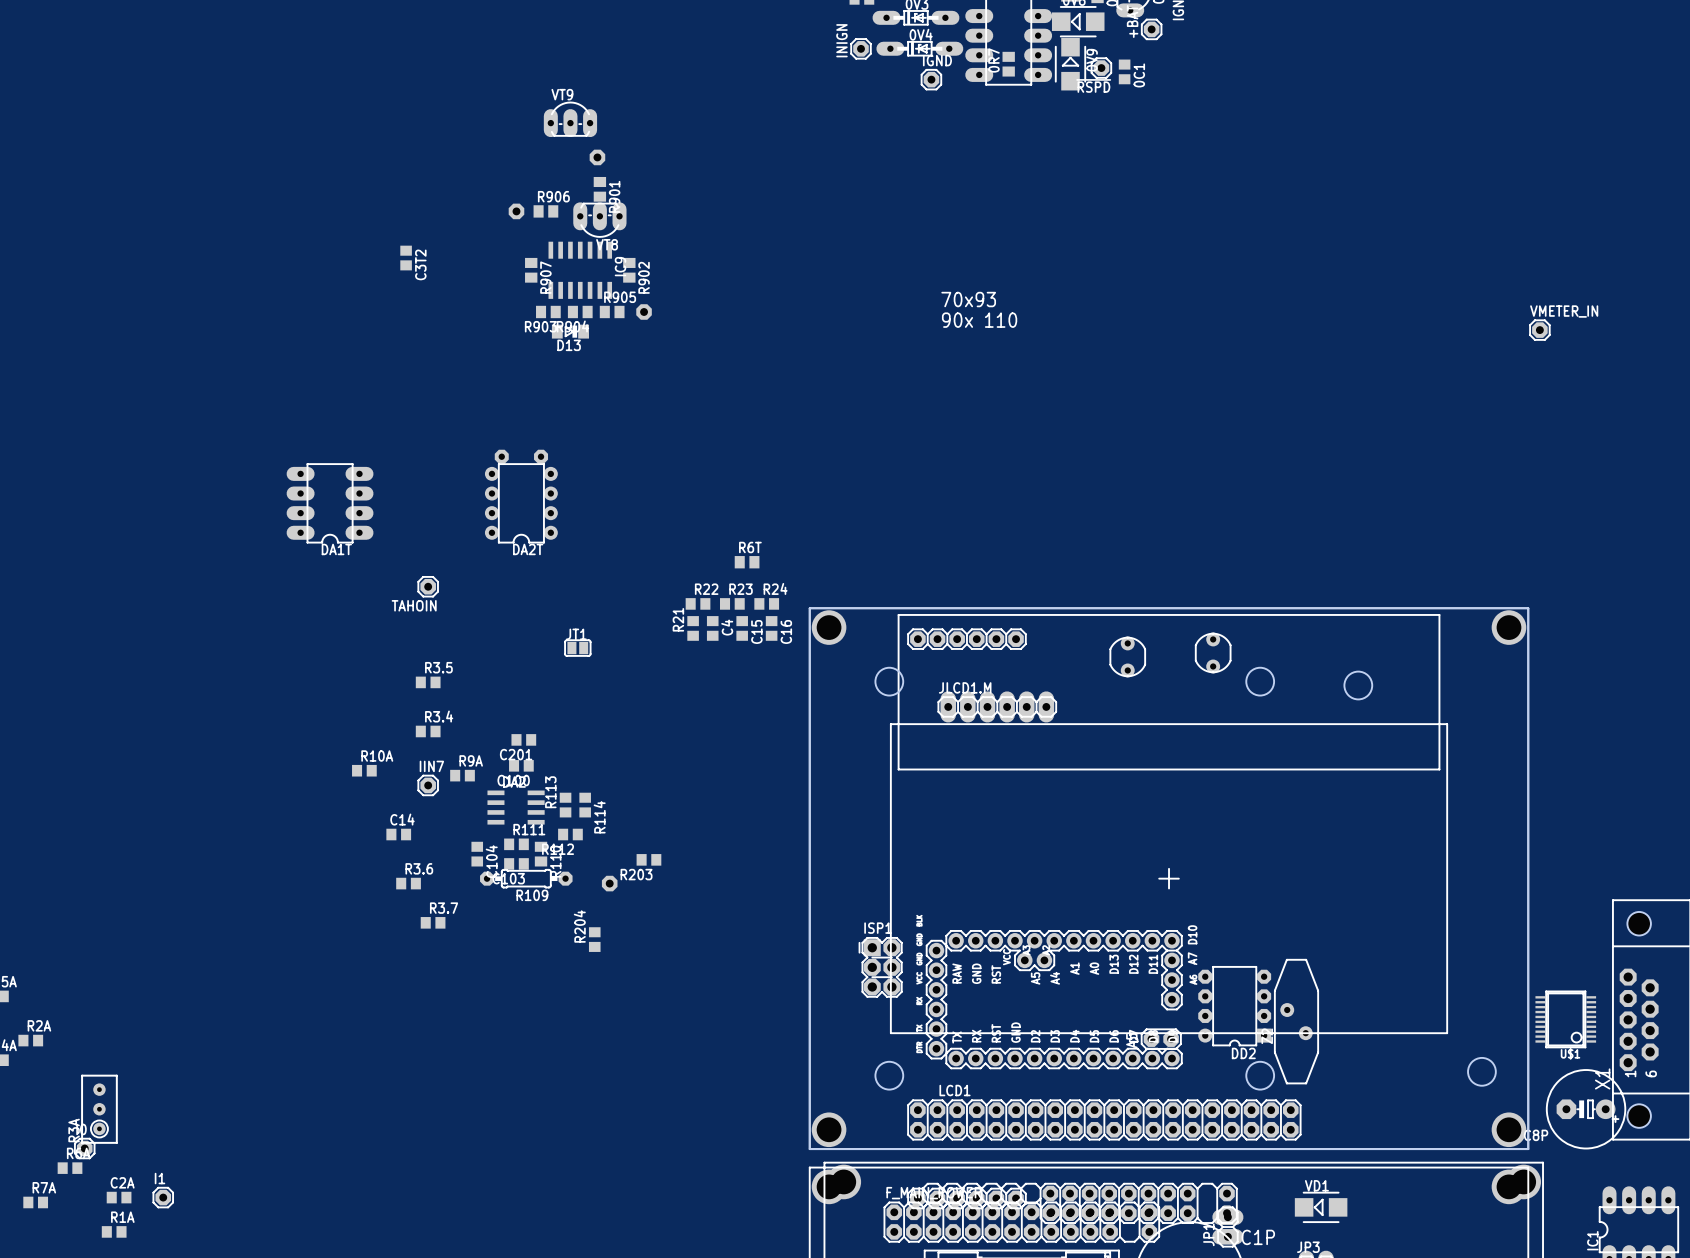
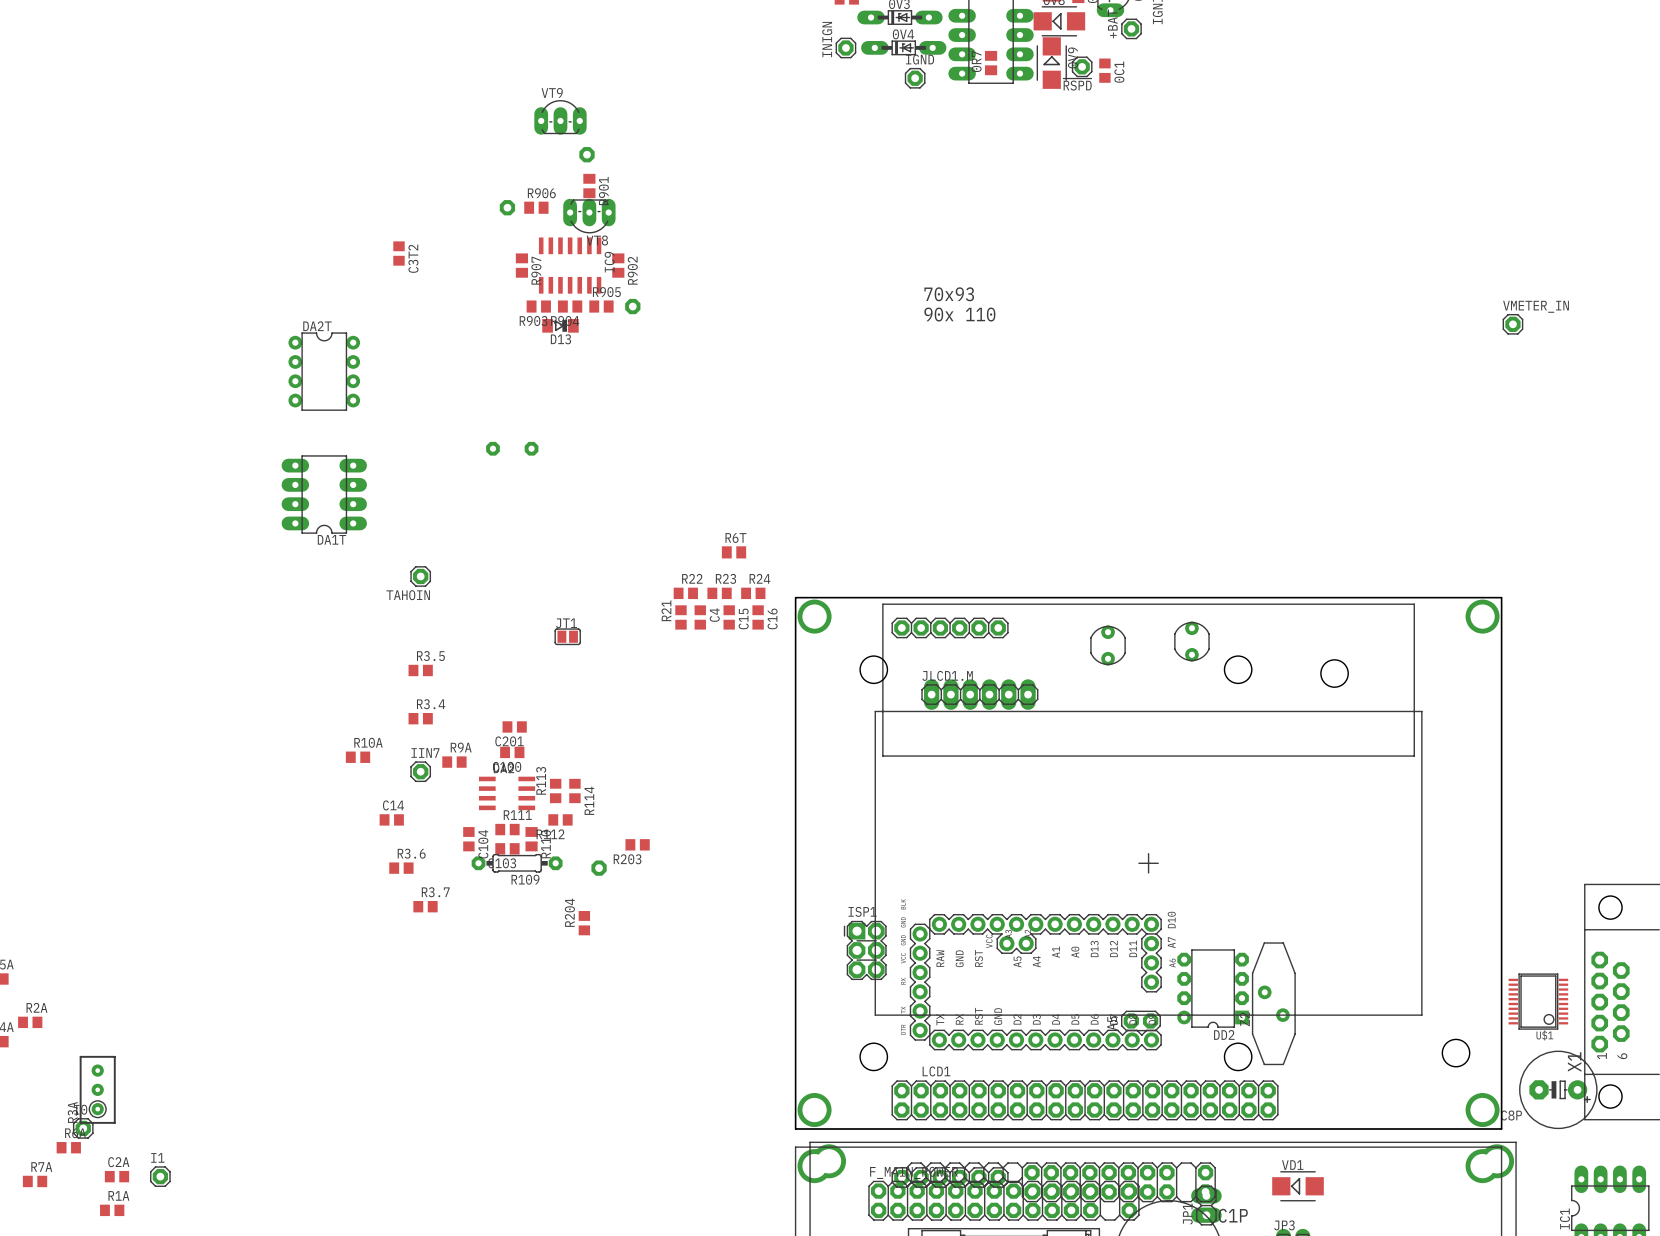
DA2T rotation: 0° (521, 503) -> 180° (324, 371)
DA2T position: (521, 503) -> (324, 371)

